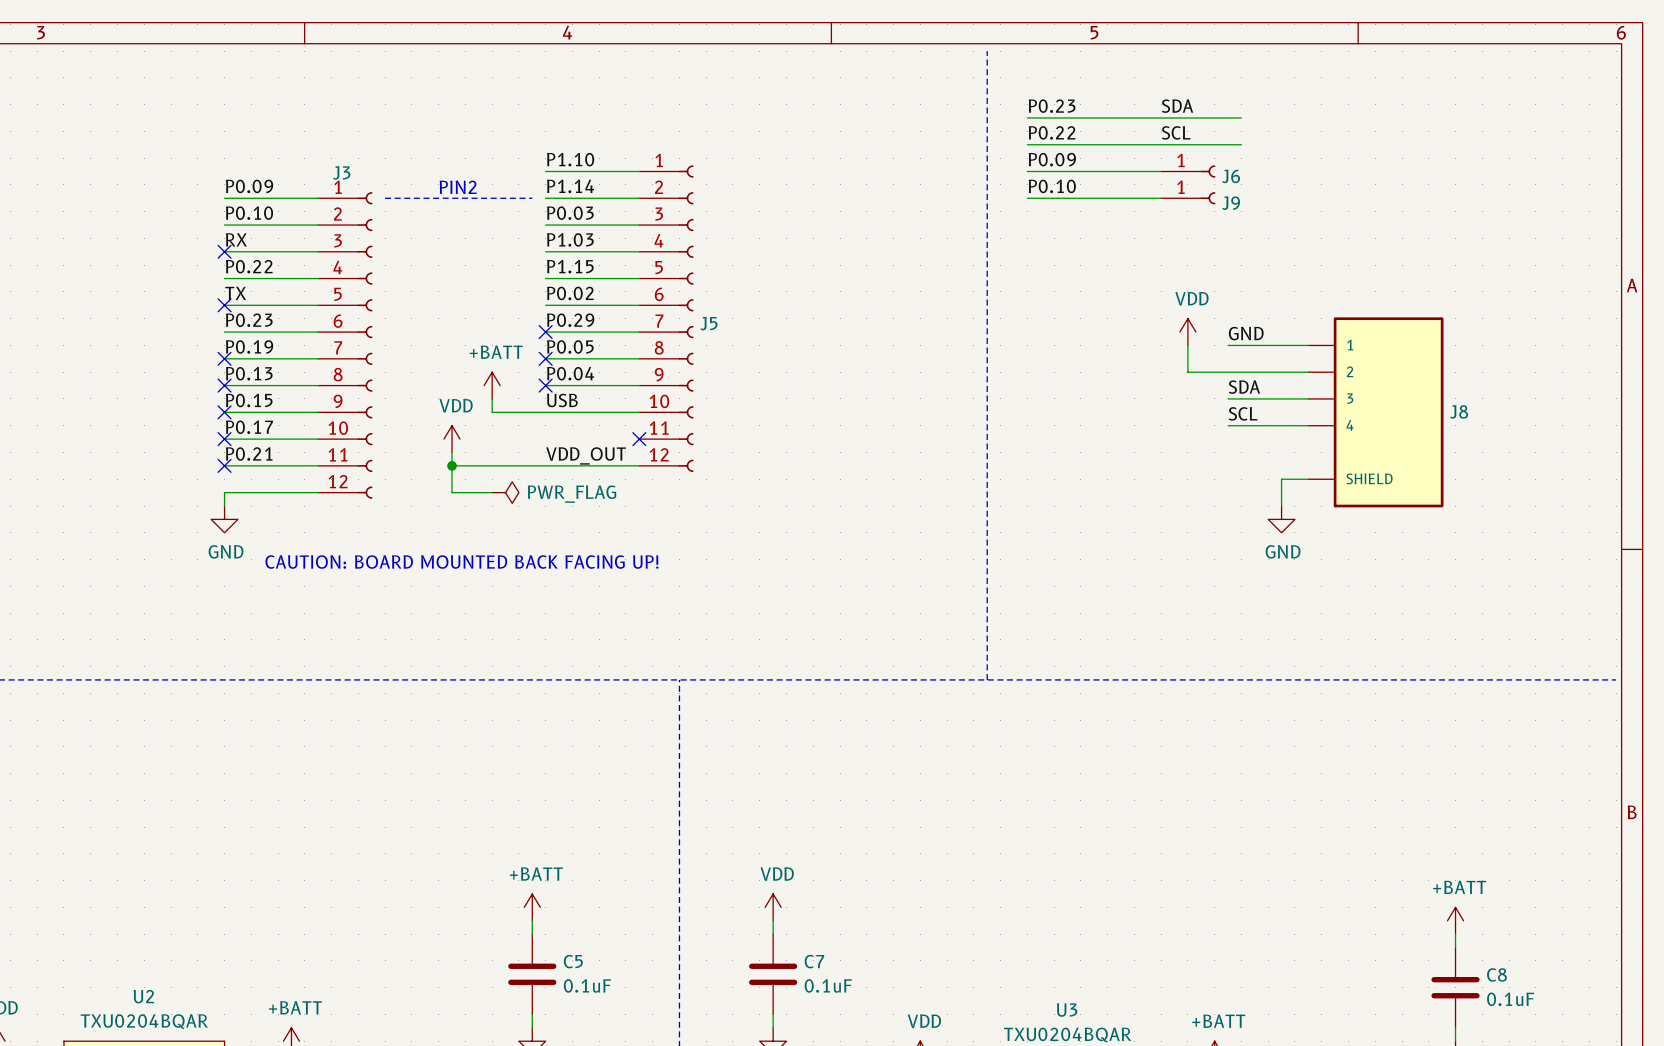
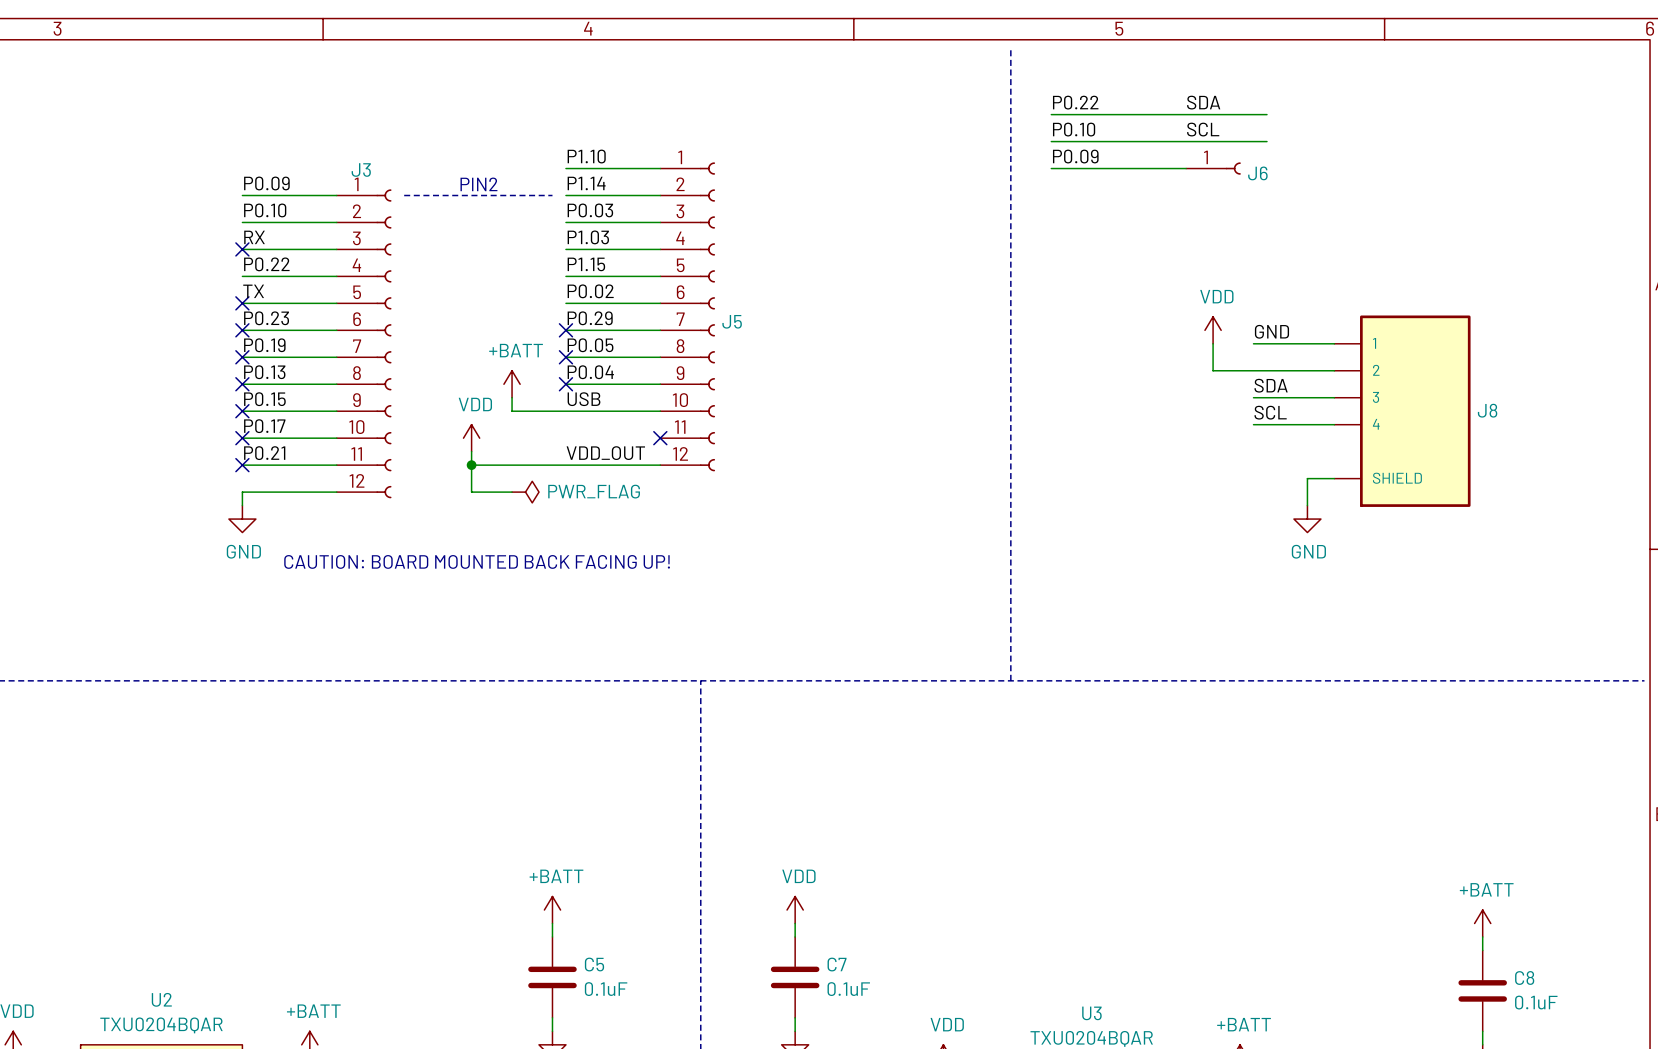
label: P0.23 (1052, 106) -> P0.22 (1075, 102)
label: P0.22 (1052, 132) -> P0.10 (1074, 129)
label: P0.10 (1052, 186) -> none
wire: (1027, 198) (1161, 198) -> none
J9: (1188, 198) -> none
no-connect mark: none -> (242, 330)

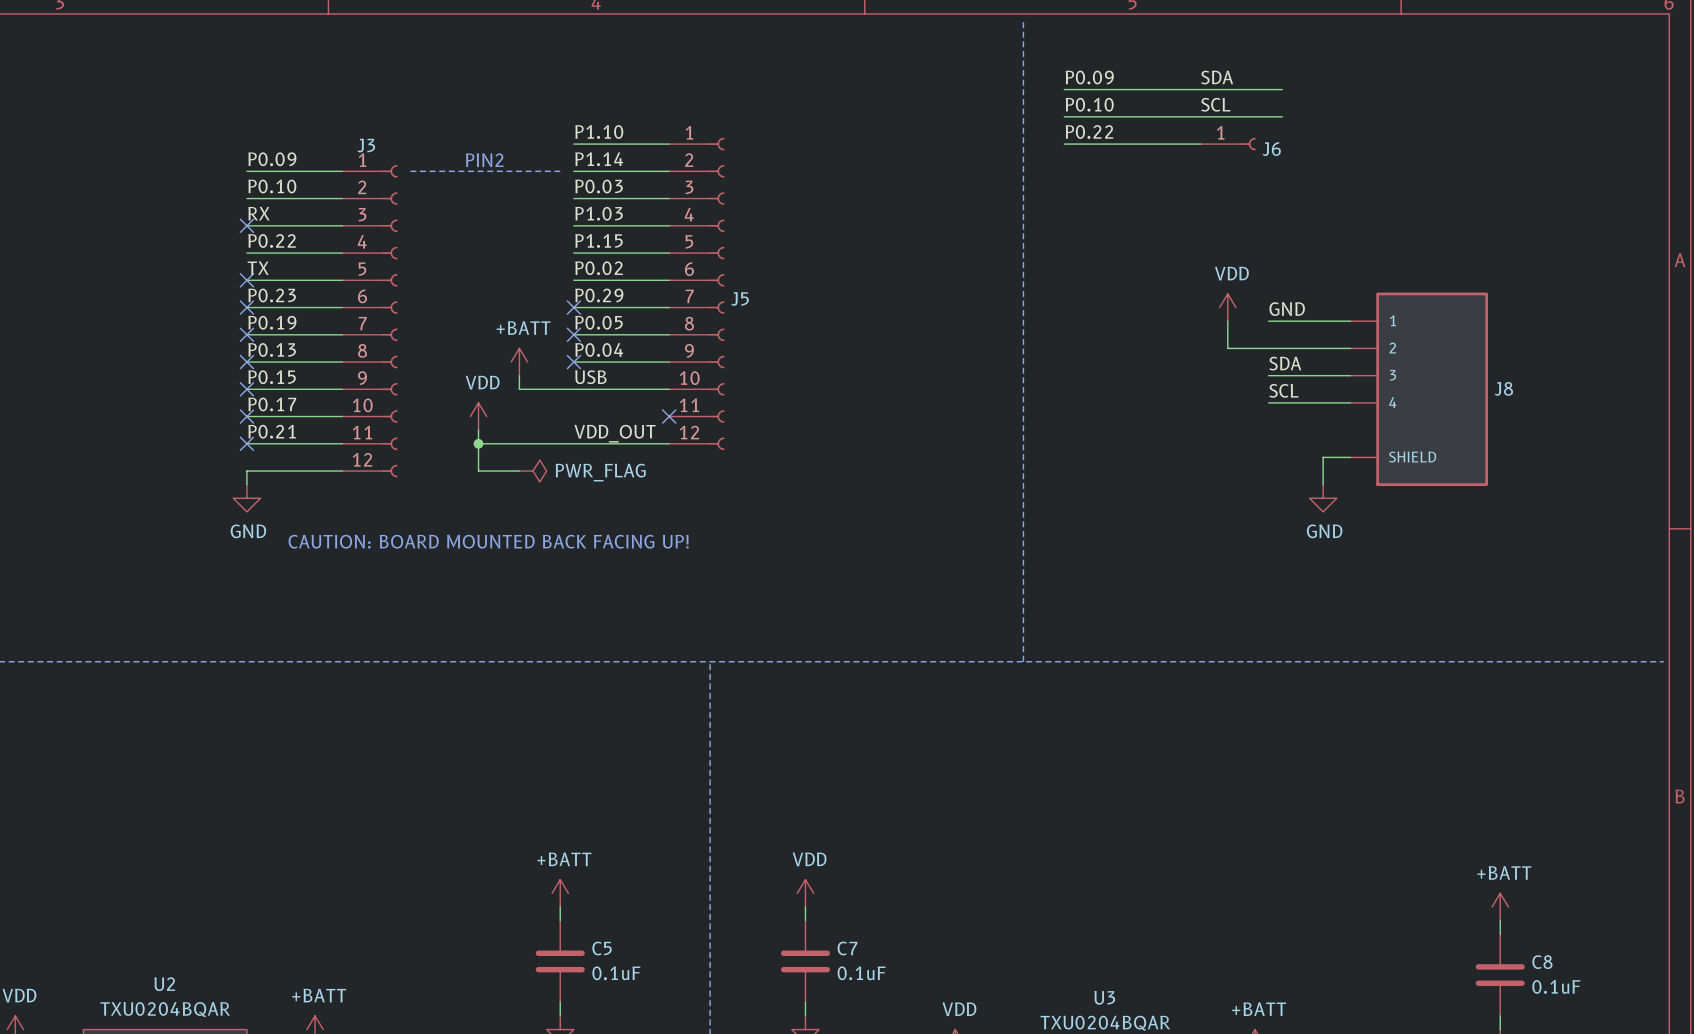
label: P0.22 (1075, 102) -> P0.09 (1089, 77)
label: P0.09 (1075, 156) -> P0.22 (1089, 132)

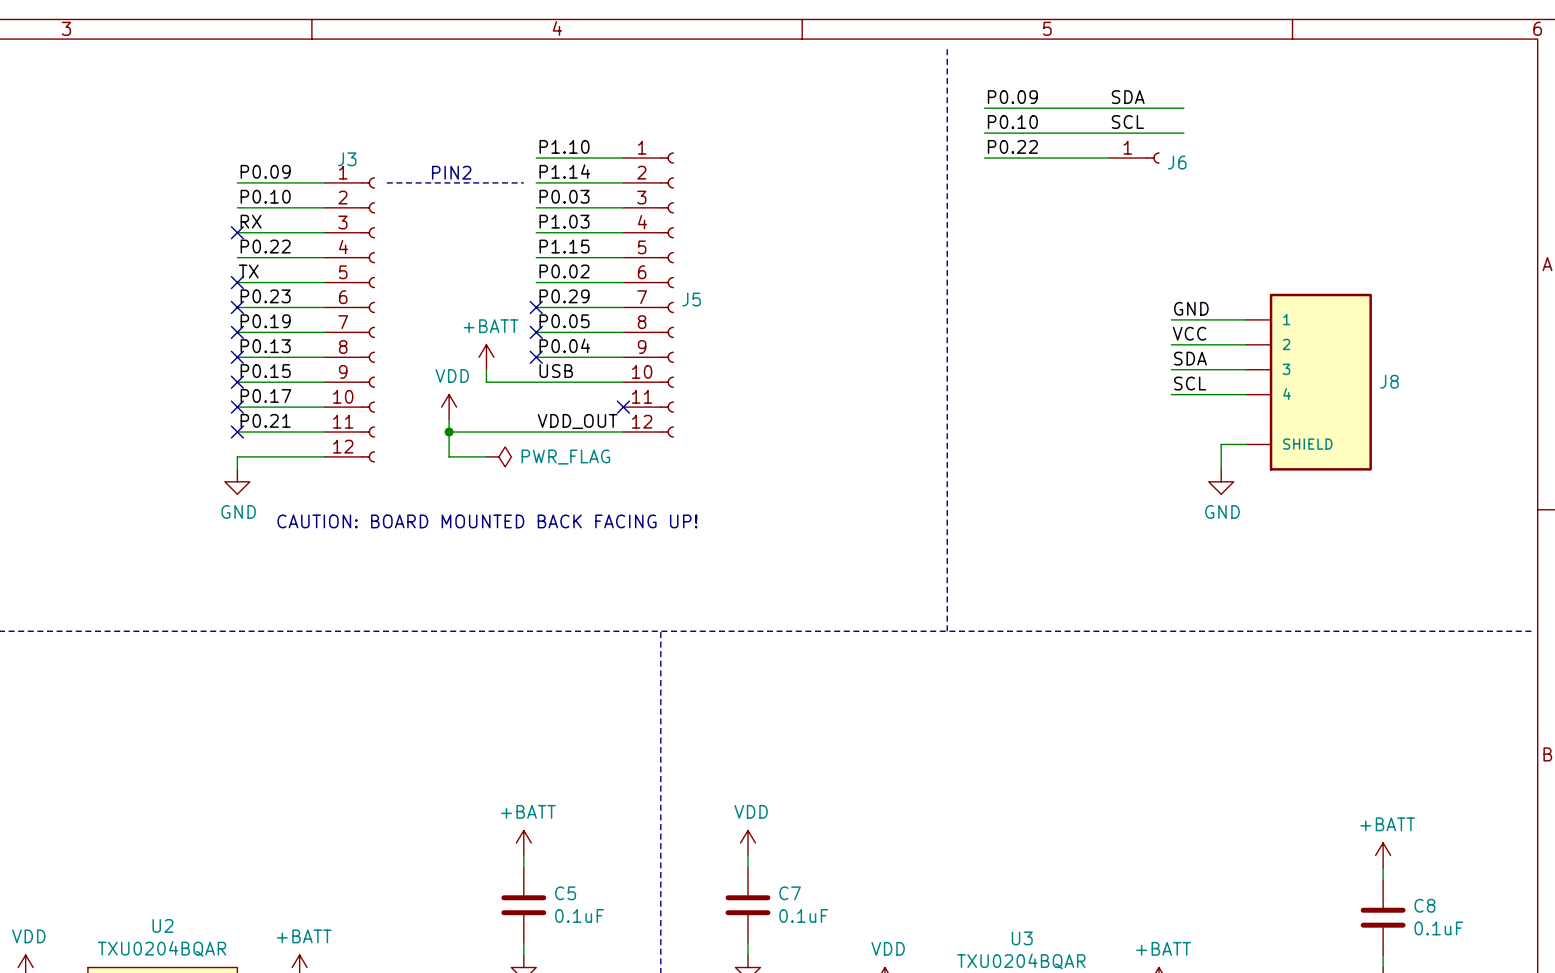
power symbol: VDD (1227, 307) -> none
wire: (1227, 321) (1227, 348) (1268, 348) -> none
label: none -> VCC (1189, 333)

